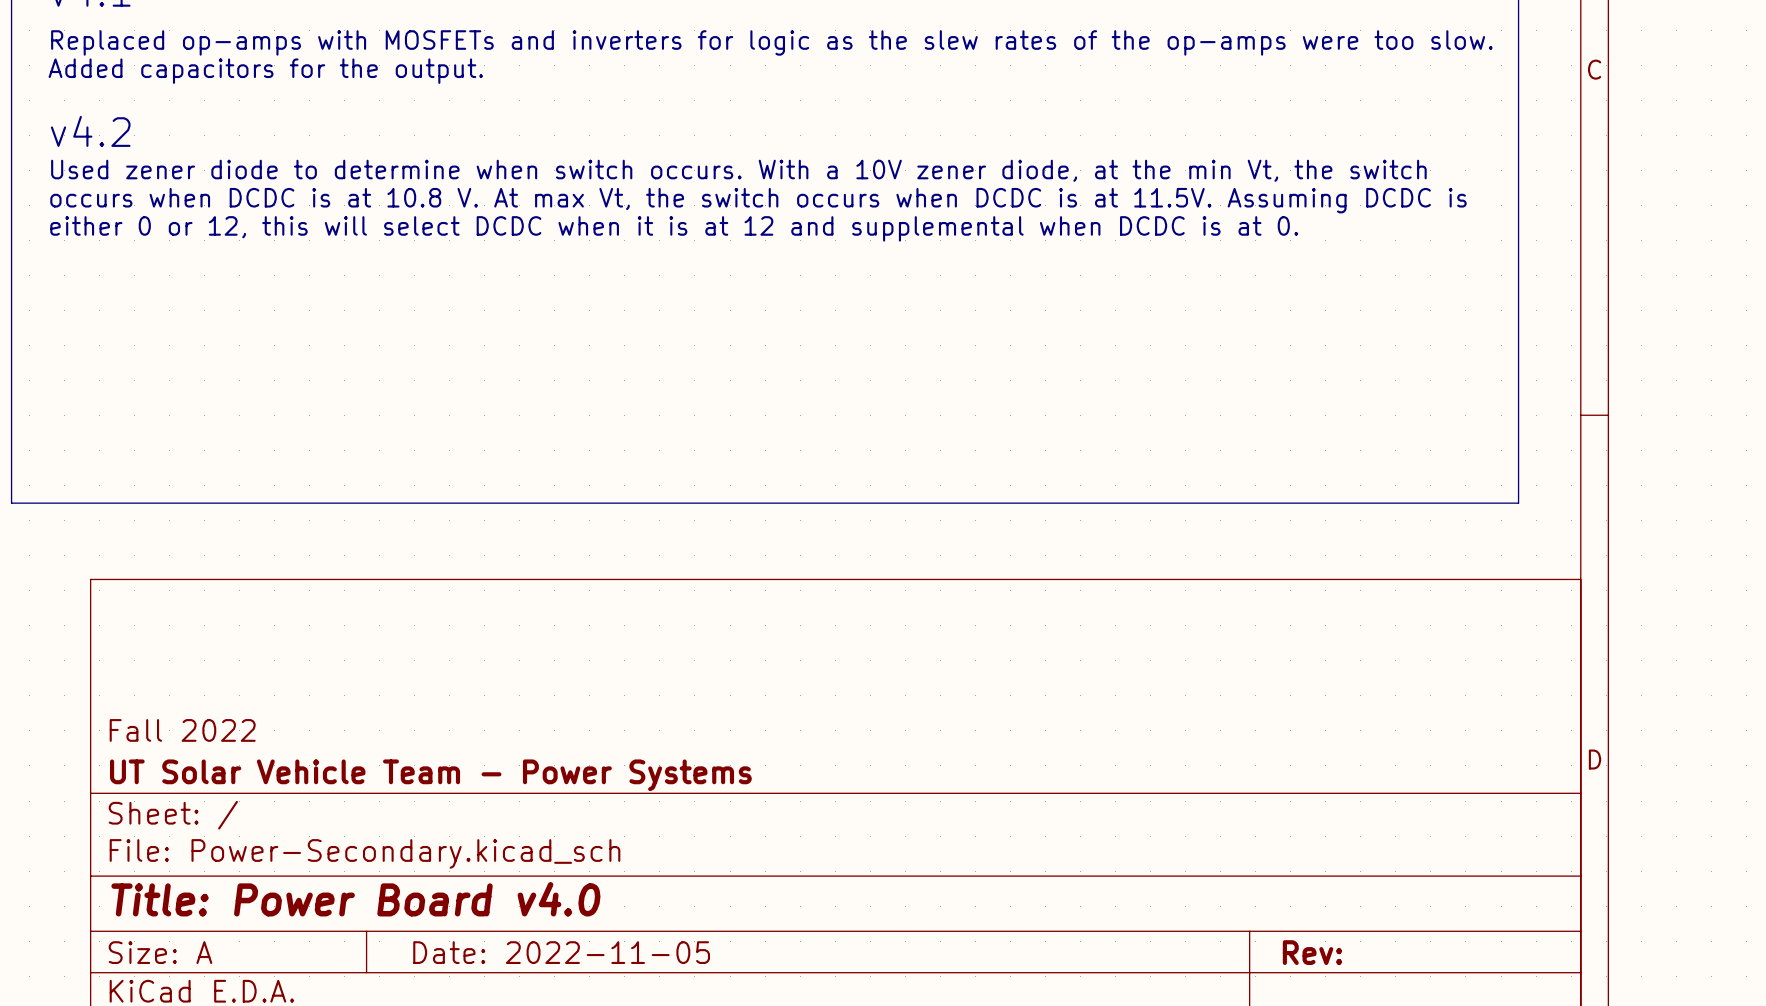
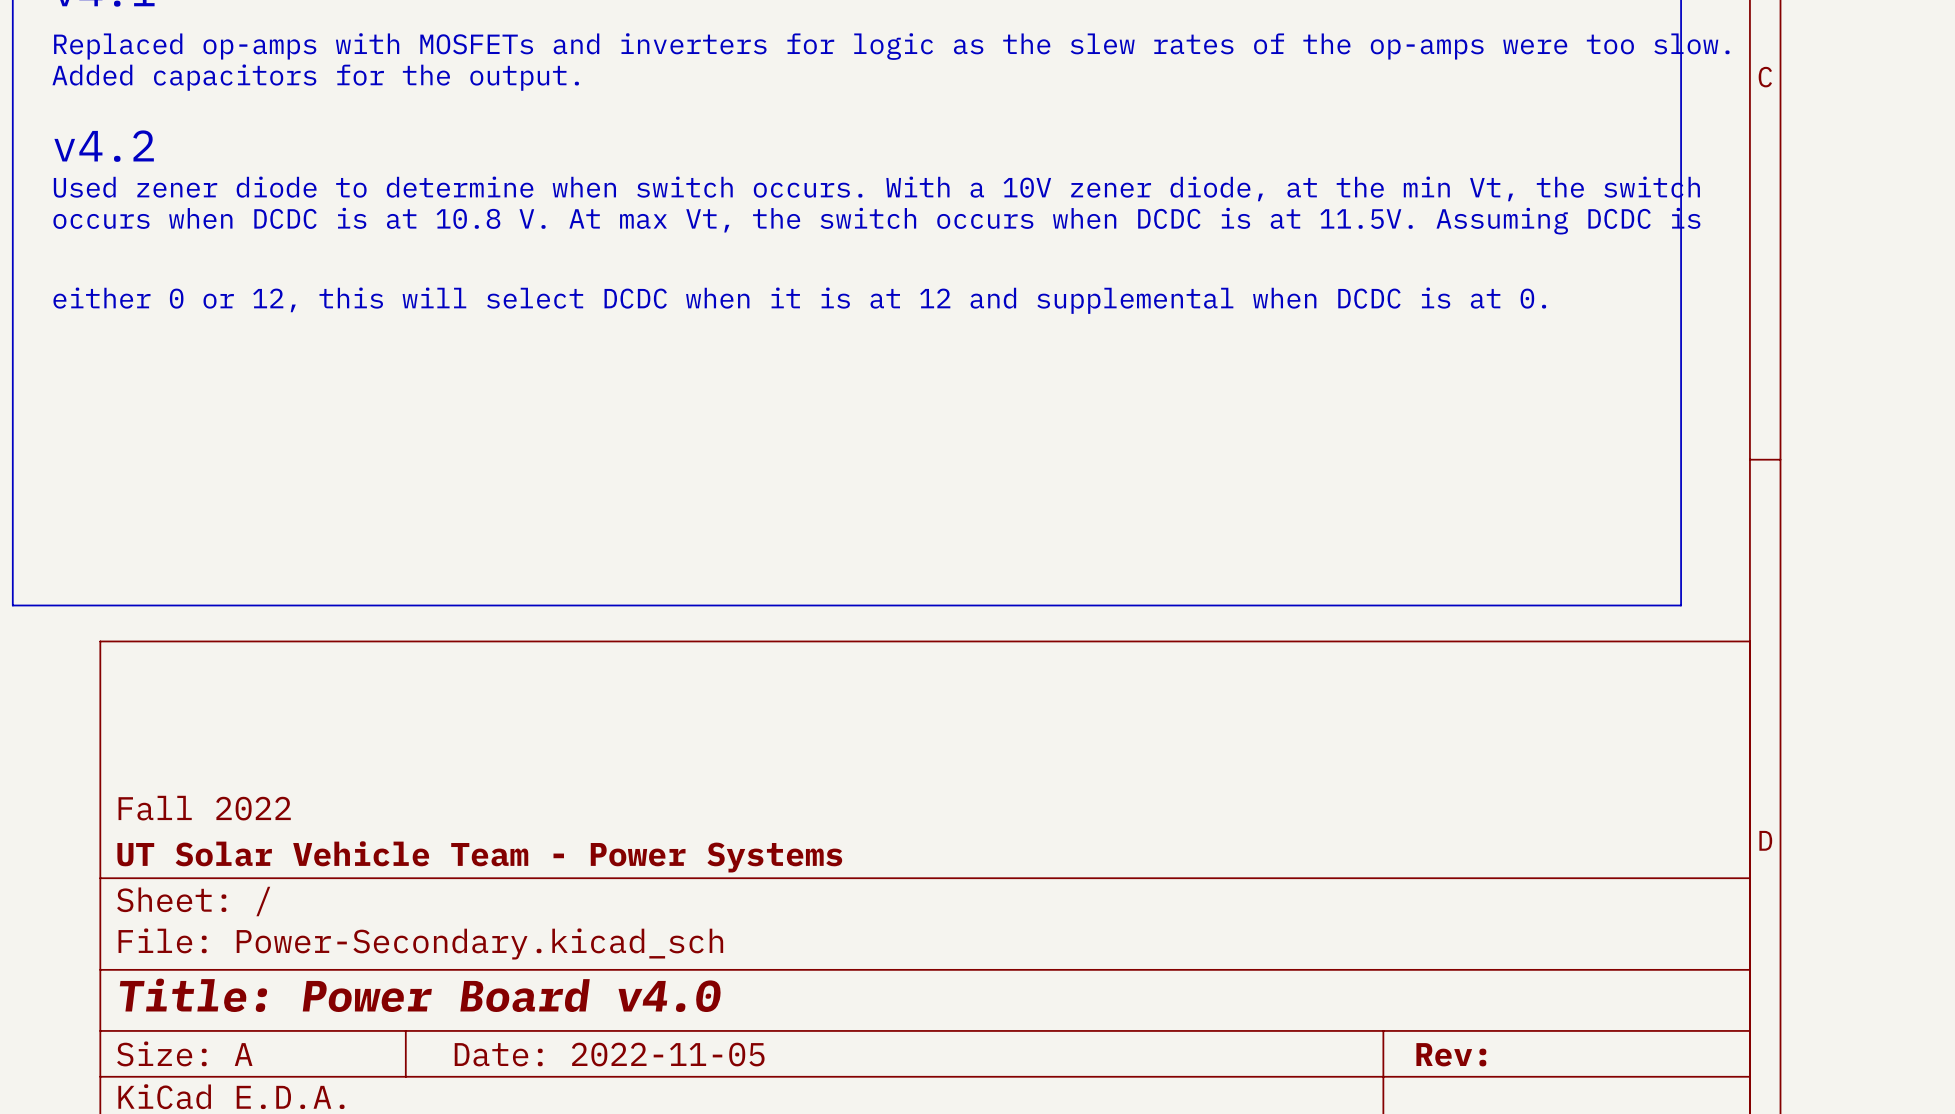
text position: either 0 or 12, this will select DCDC when it is at 12 and supplemental when DCDC is at 0. (674, 228) -> either 0 or 12, this will select DCDC when it is at 12 and supplemental when DCDC is at 0. (799, 300)
line: (11, 503) (1518, 503) -> (12, 556) (12, 605) (1681, 605) (1681, 556)

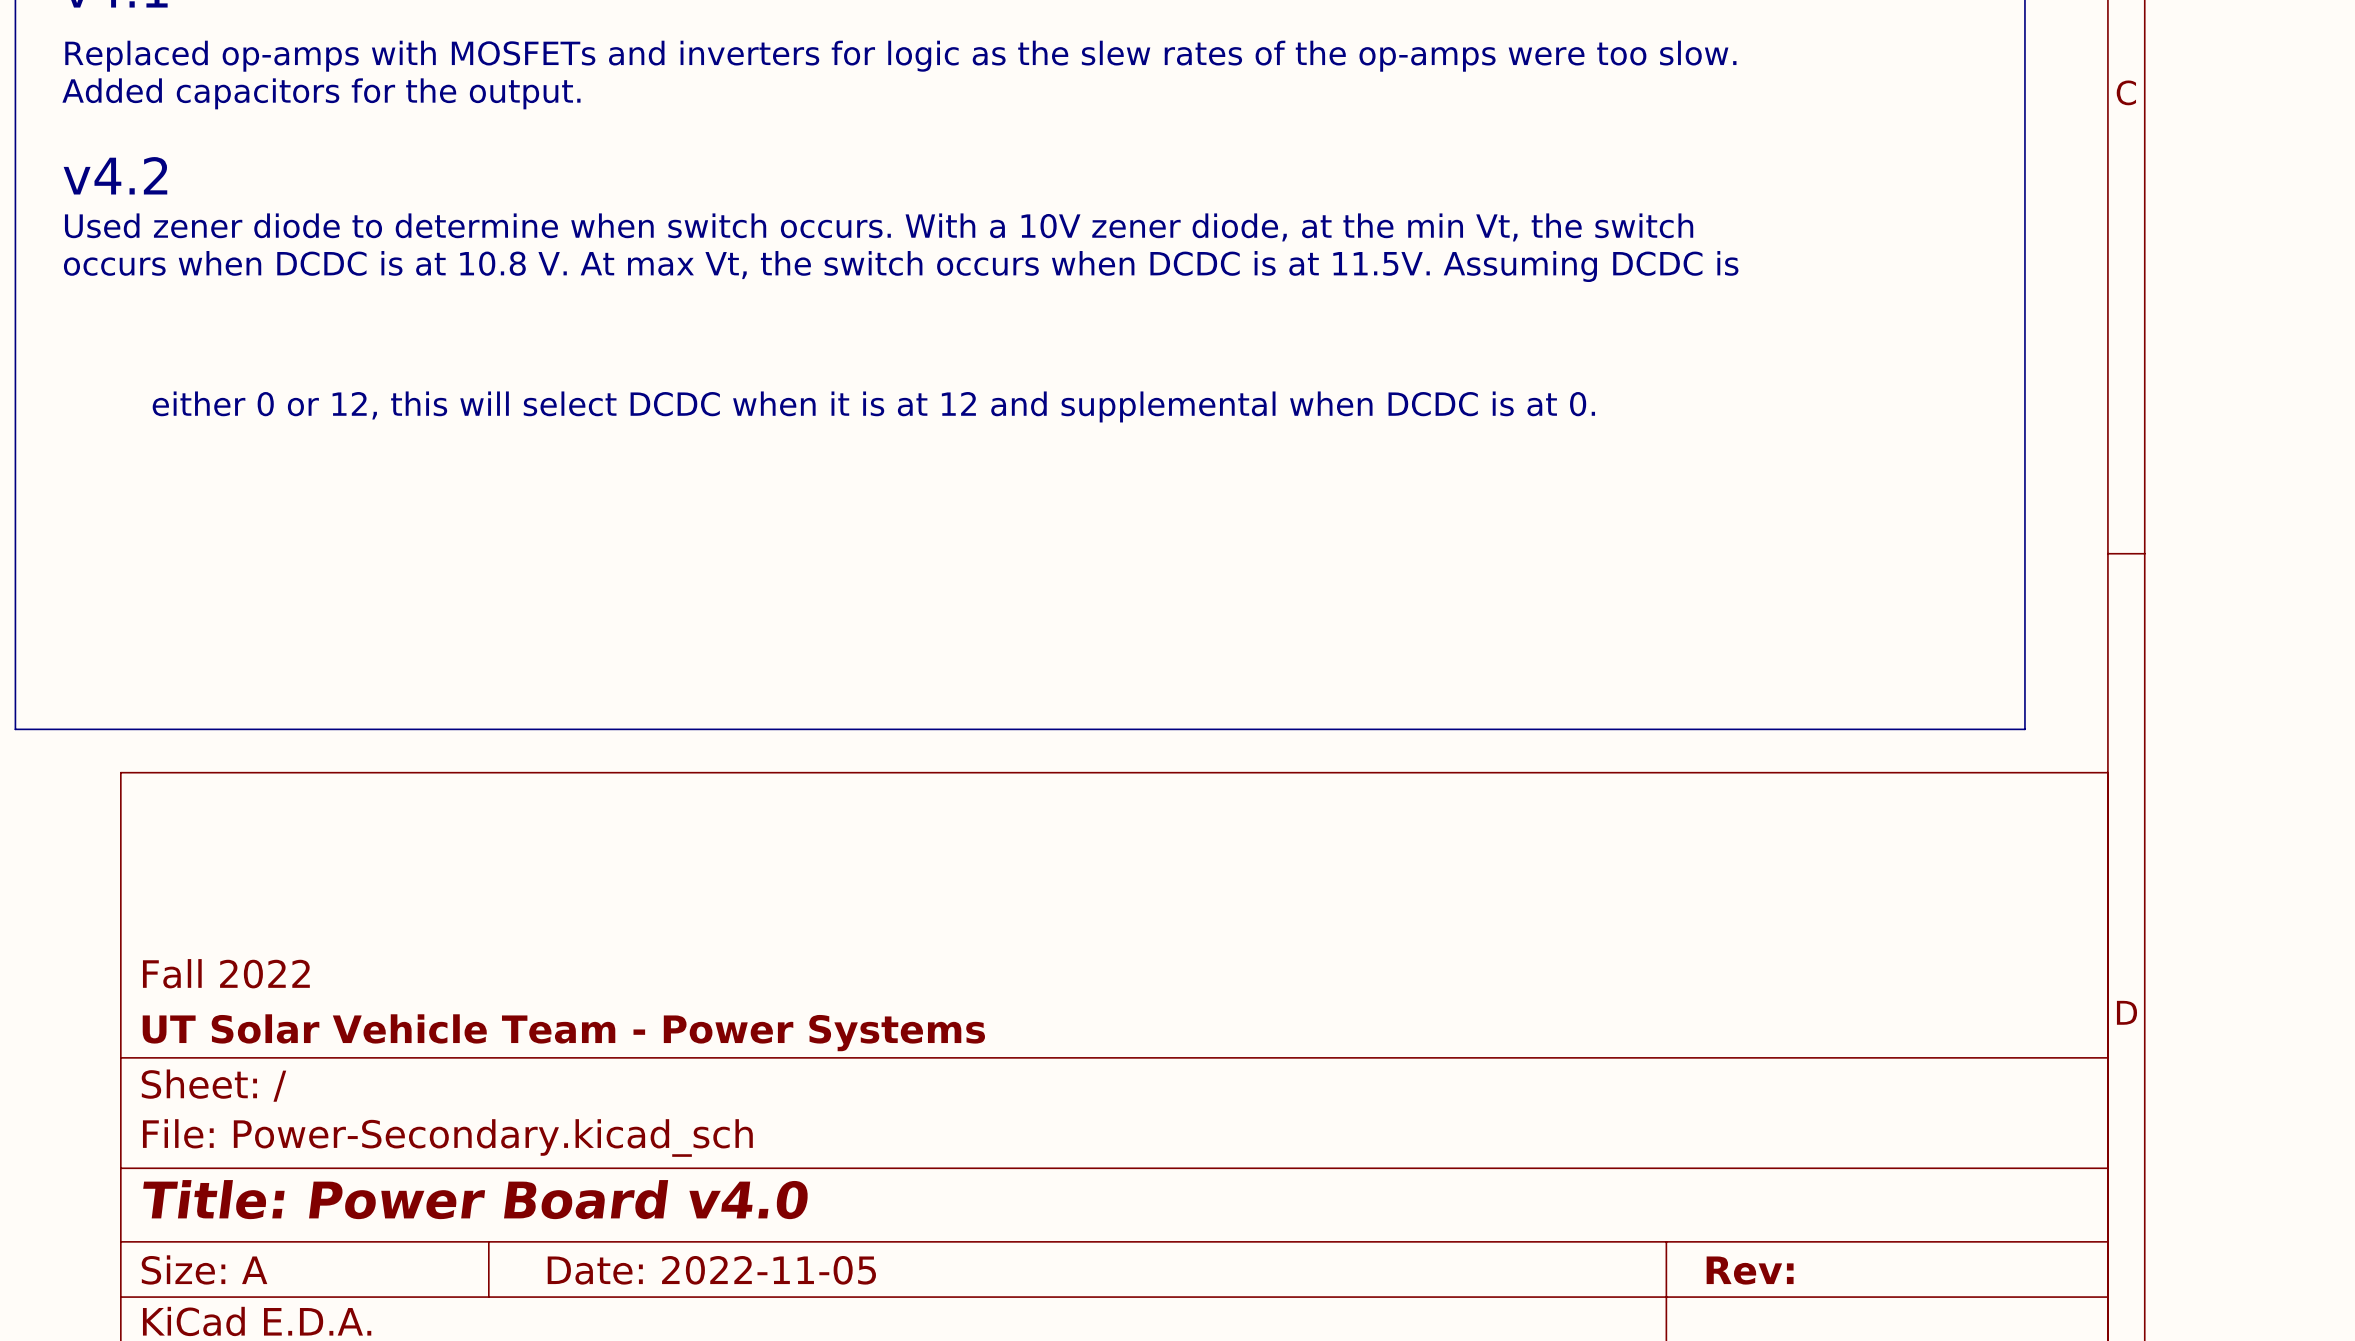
text position: either 0 or 12, this will select DCDC when it is at 12 and supplemental when DCDC is at 0. (799, 300) -> either 0 or 12, this will select DCDC when it is at 12 and supplemental when DCDC is at 0. (873, 406)

